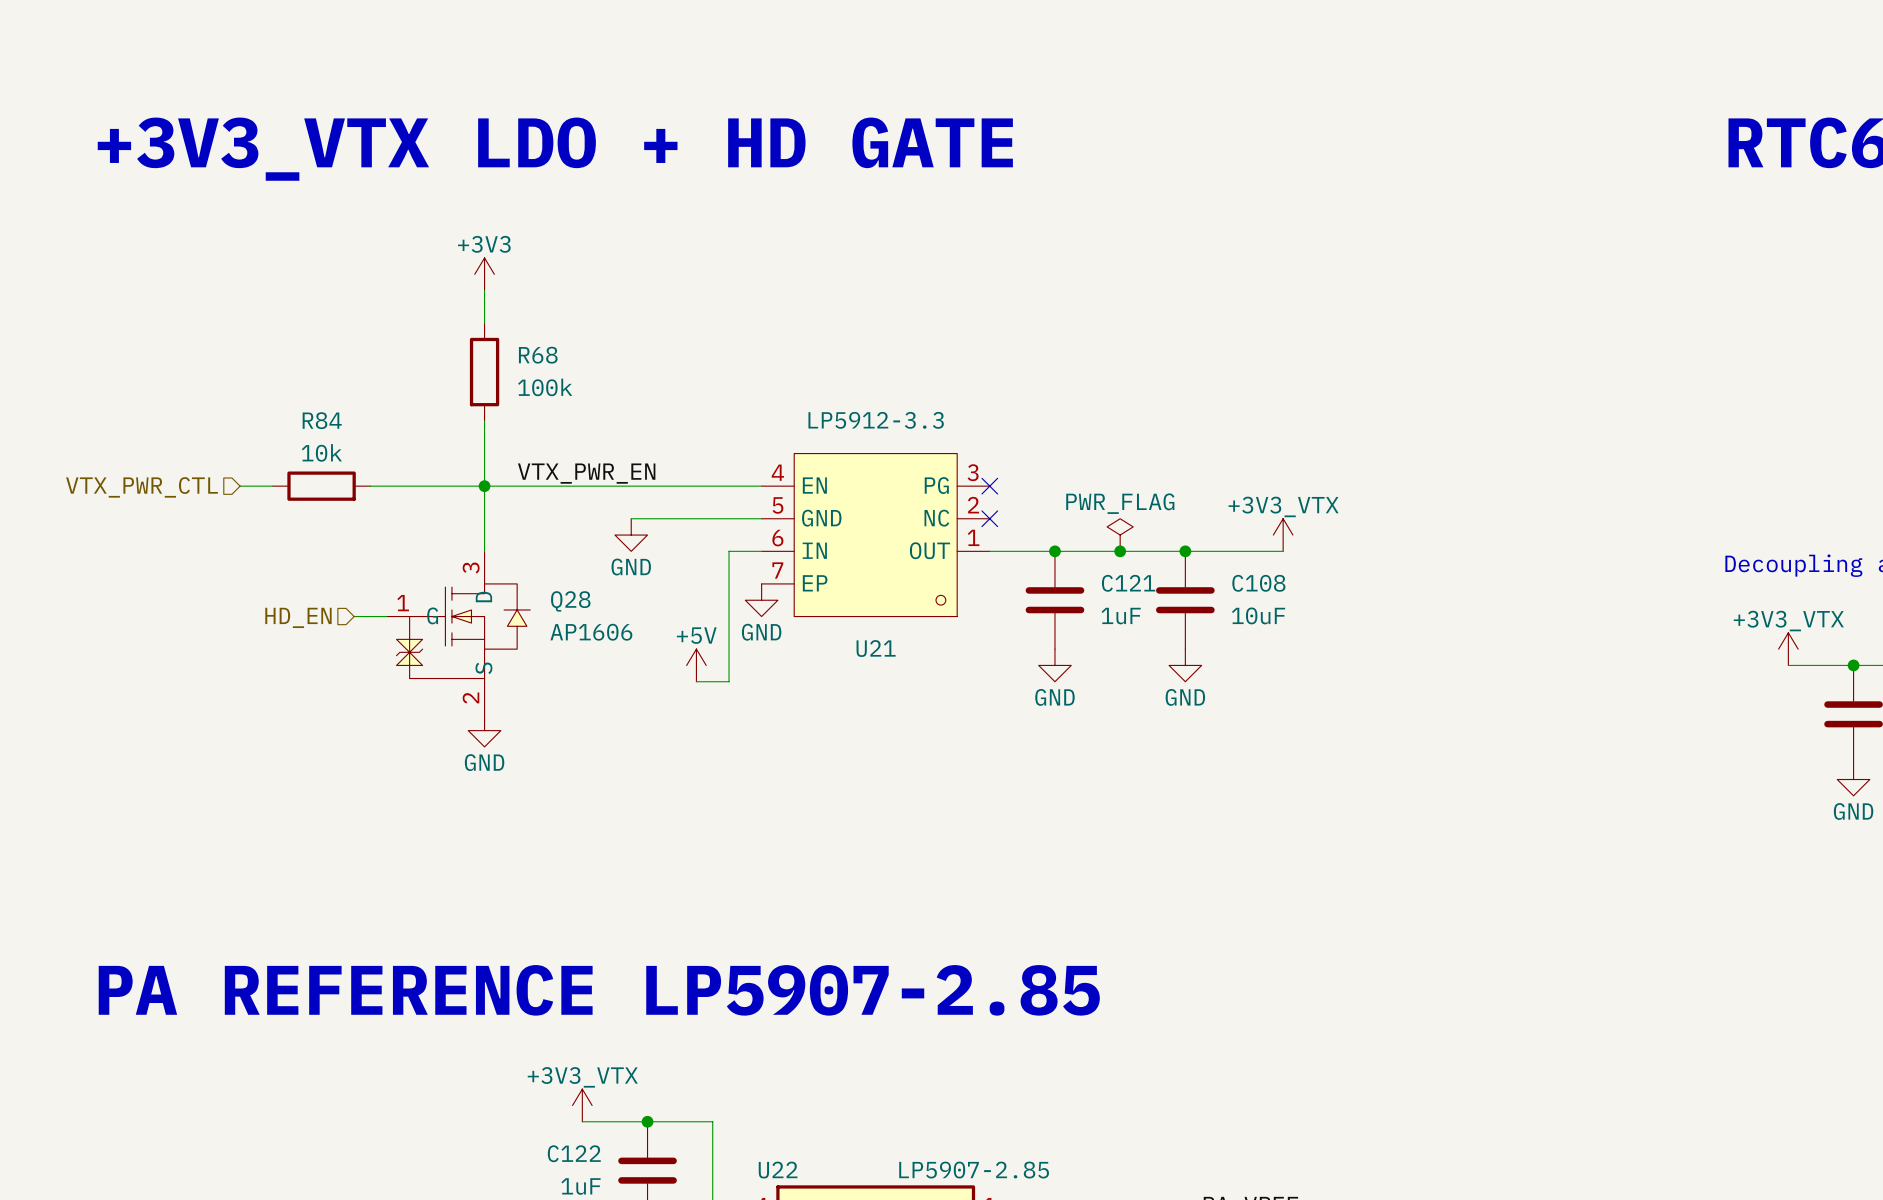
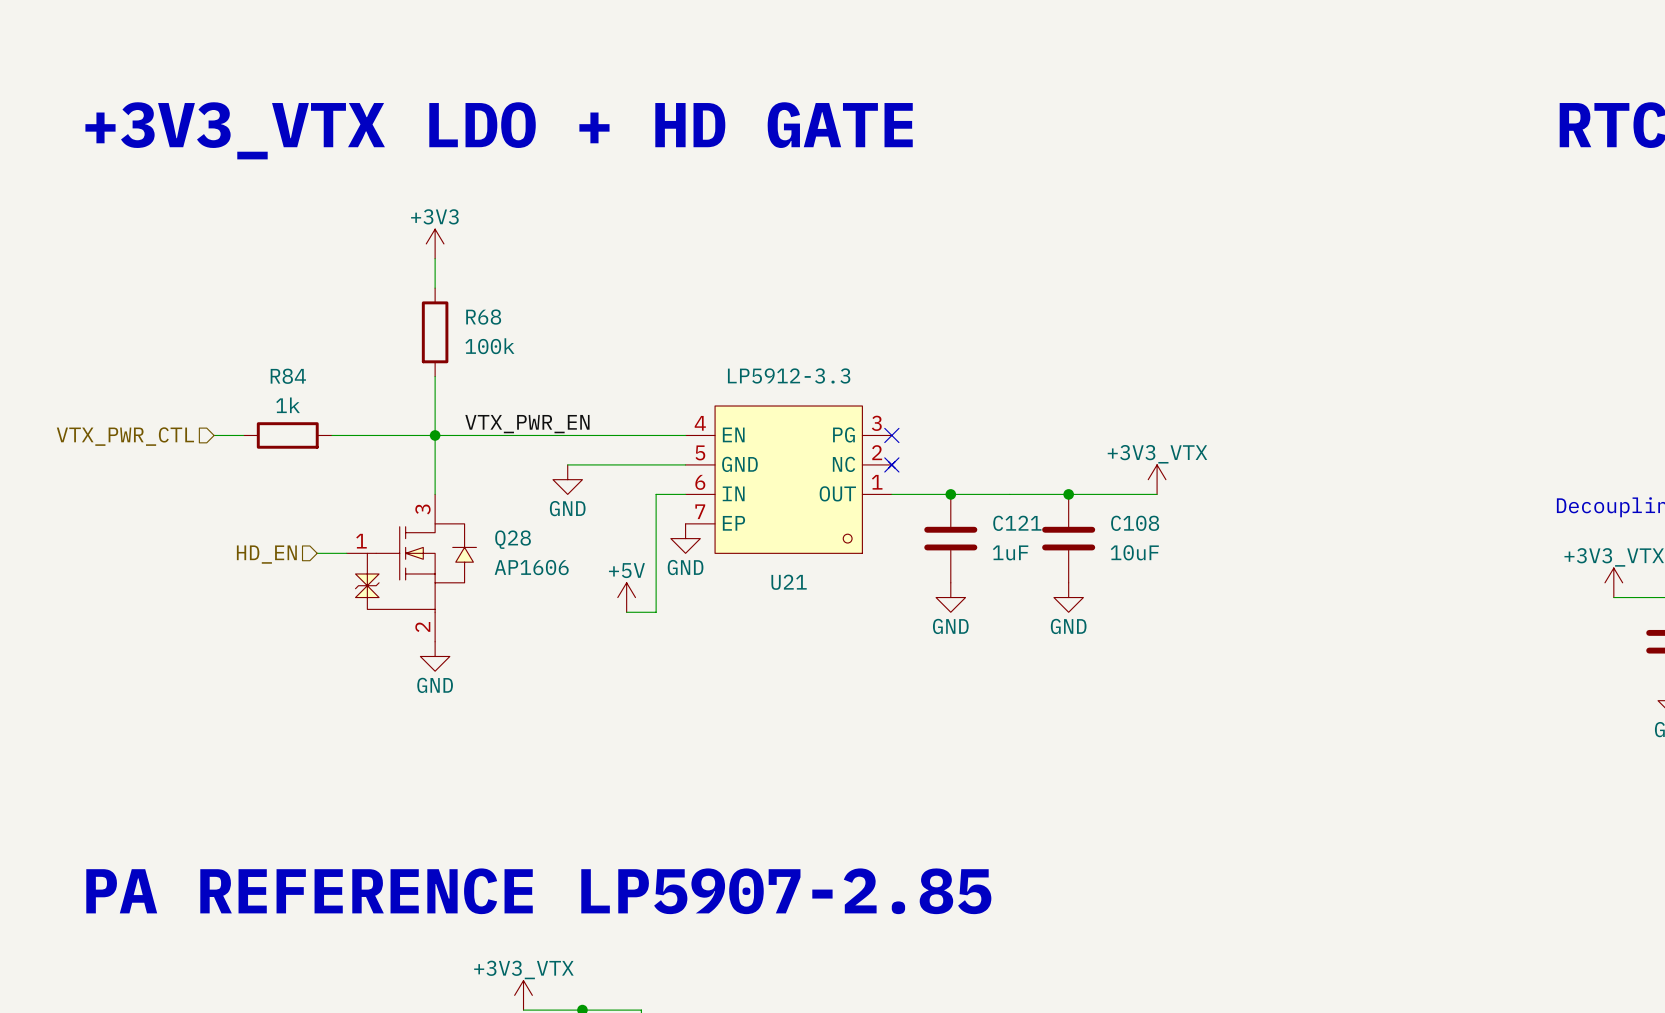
R84 value: 10k (321, 452) -> 1k (288, 405)
U21 symbol: [761, 453, 990, 617] -> [685, 406, 896, 554]
power symbol: PWR_FLAG (1120, 535) -> none
junction: (1120, 551) -> none
Q28 pin name: D (483, 597) -> none
Q28 pin name: G (432, 615) -> none
Q28 pin name: S (483, 668) -> none

